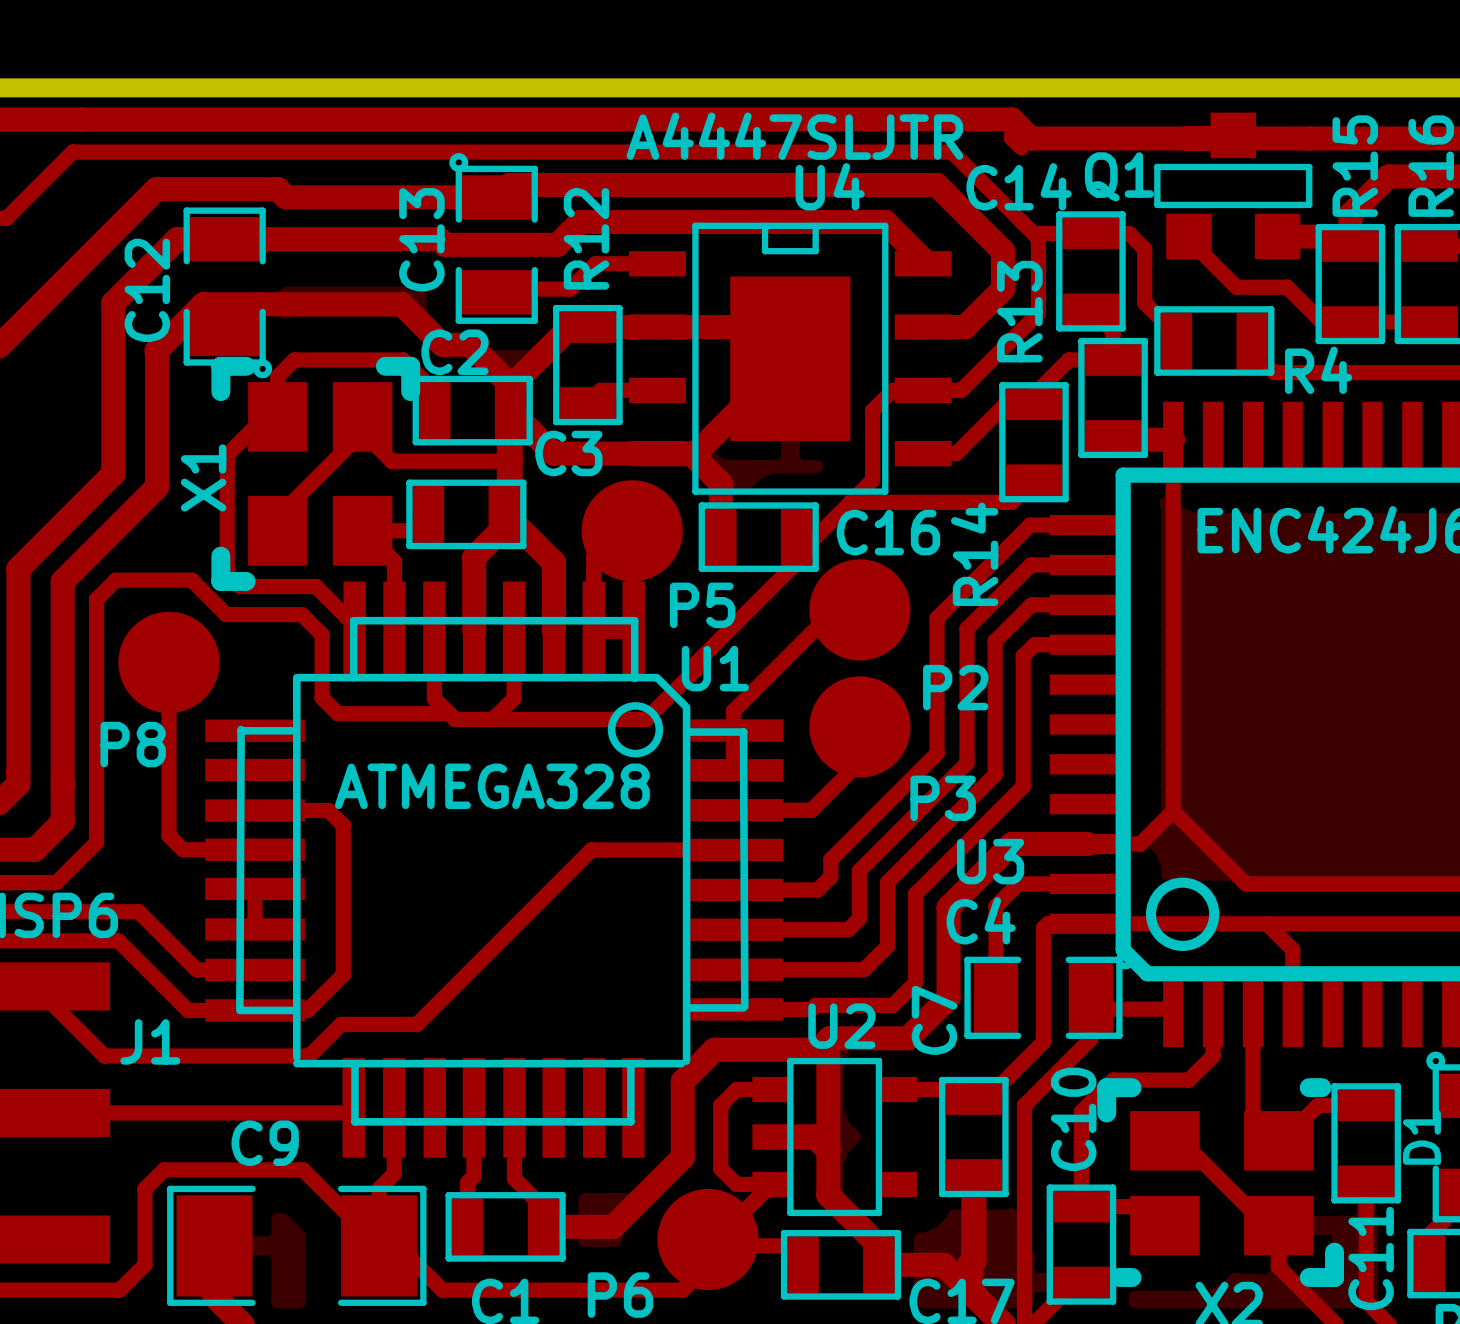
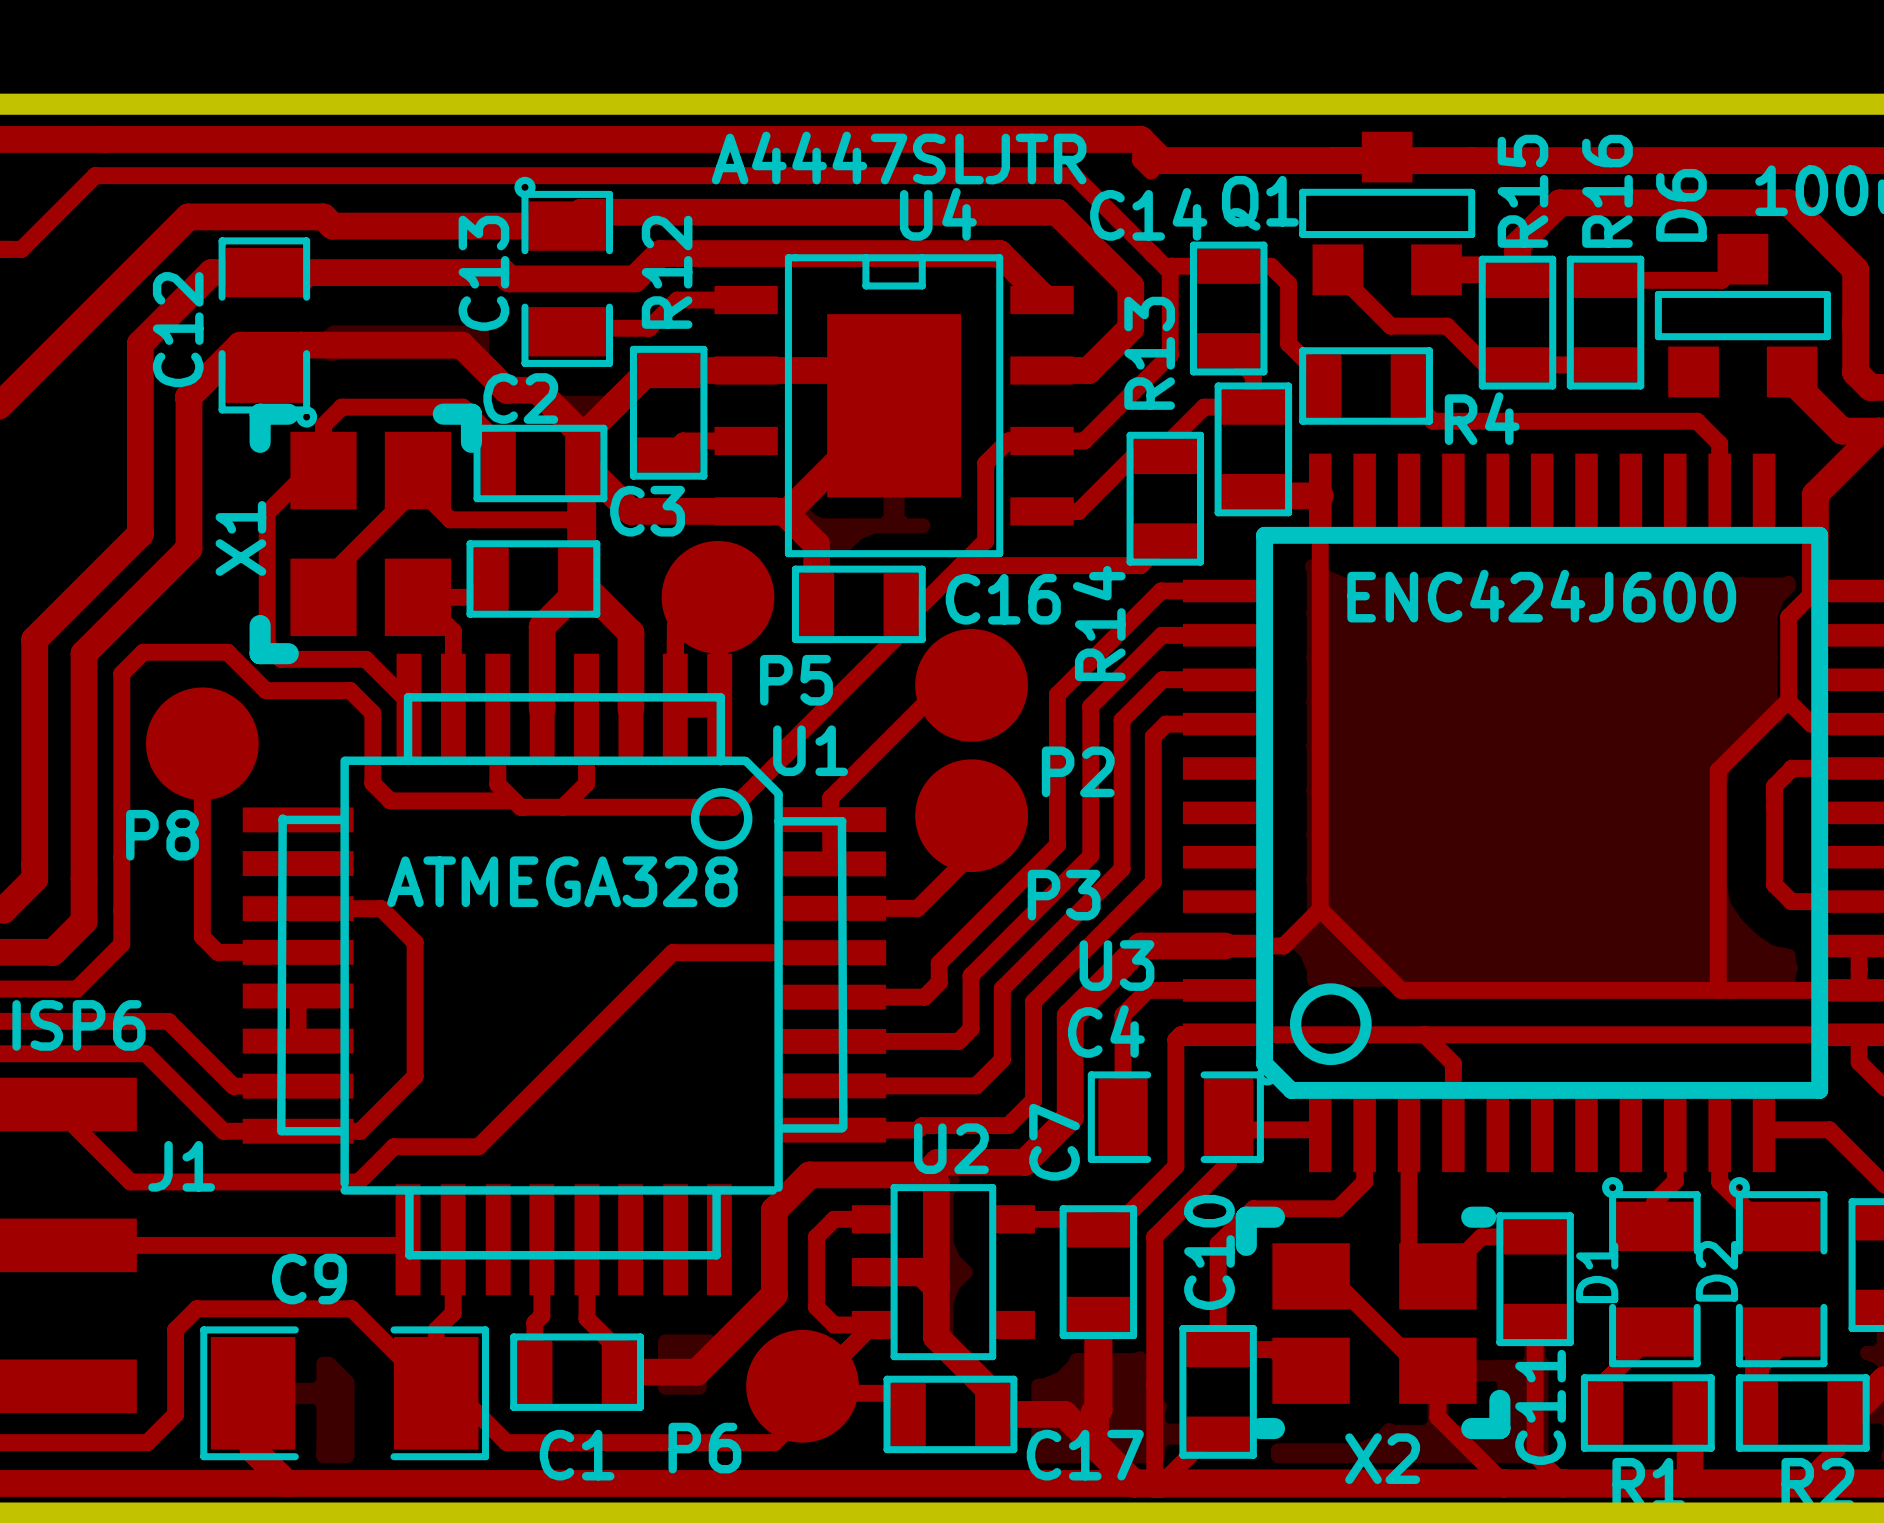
top track: (328, 810) (343, 825) (343, 974) (307, 1010) -> (379, 908) (415, 942) (415, 1076) (360, 1131) (356, 1131)

